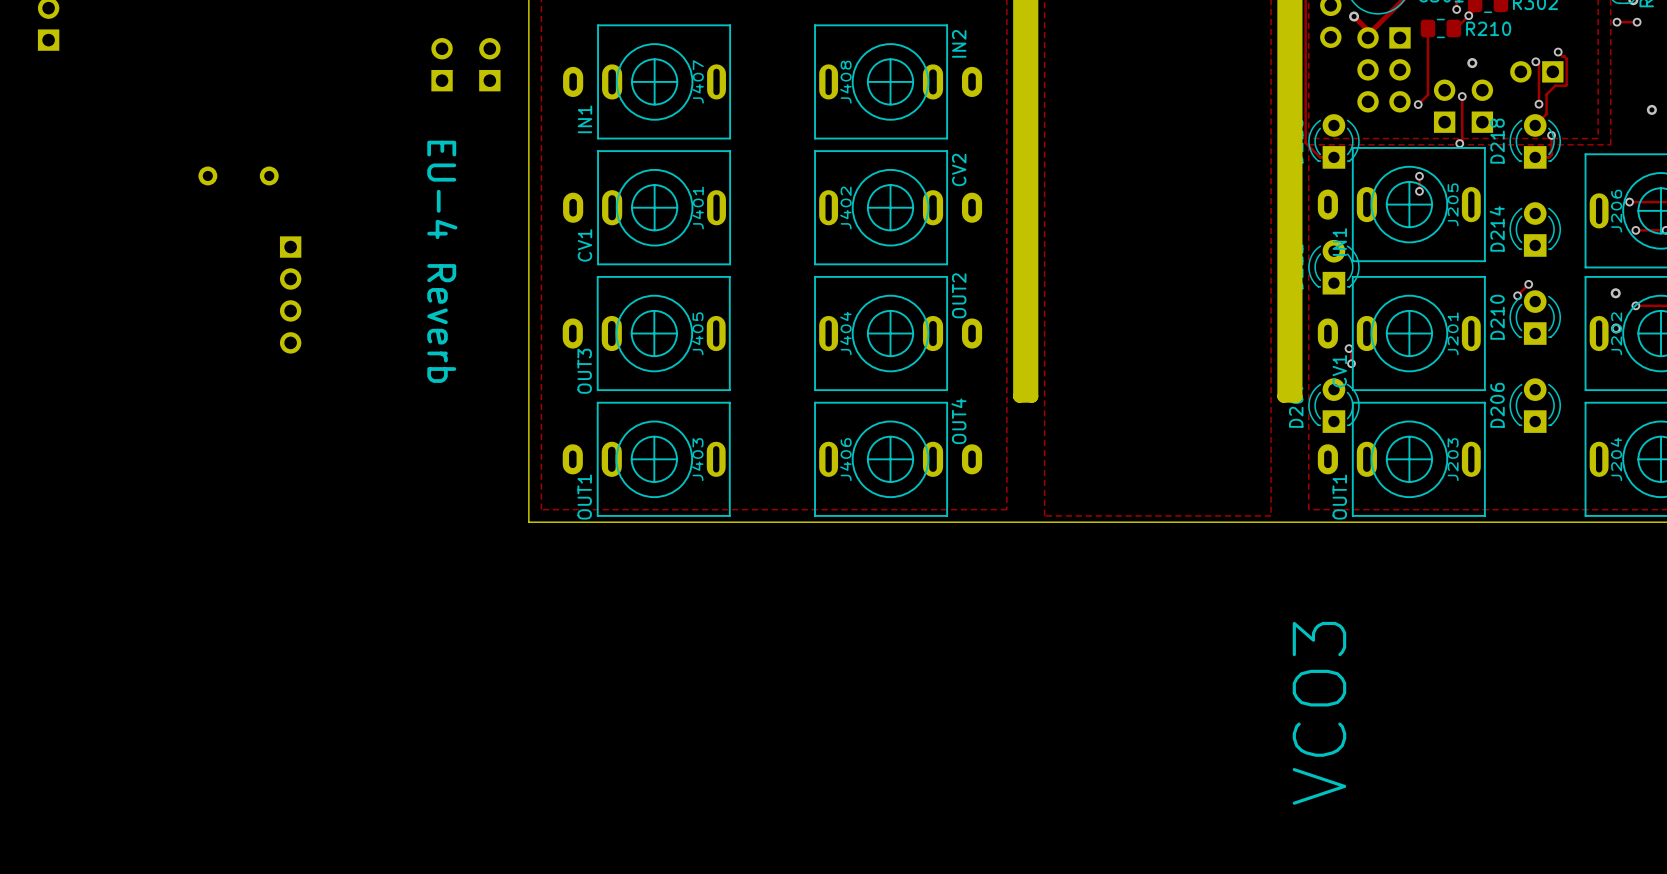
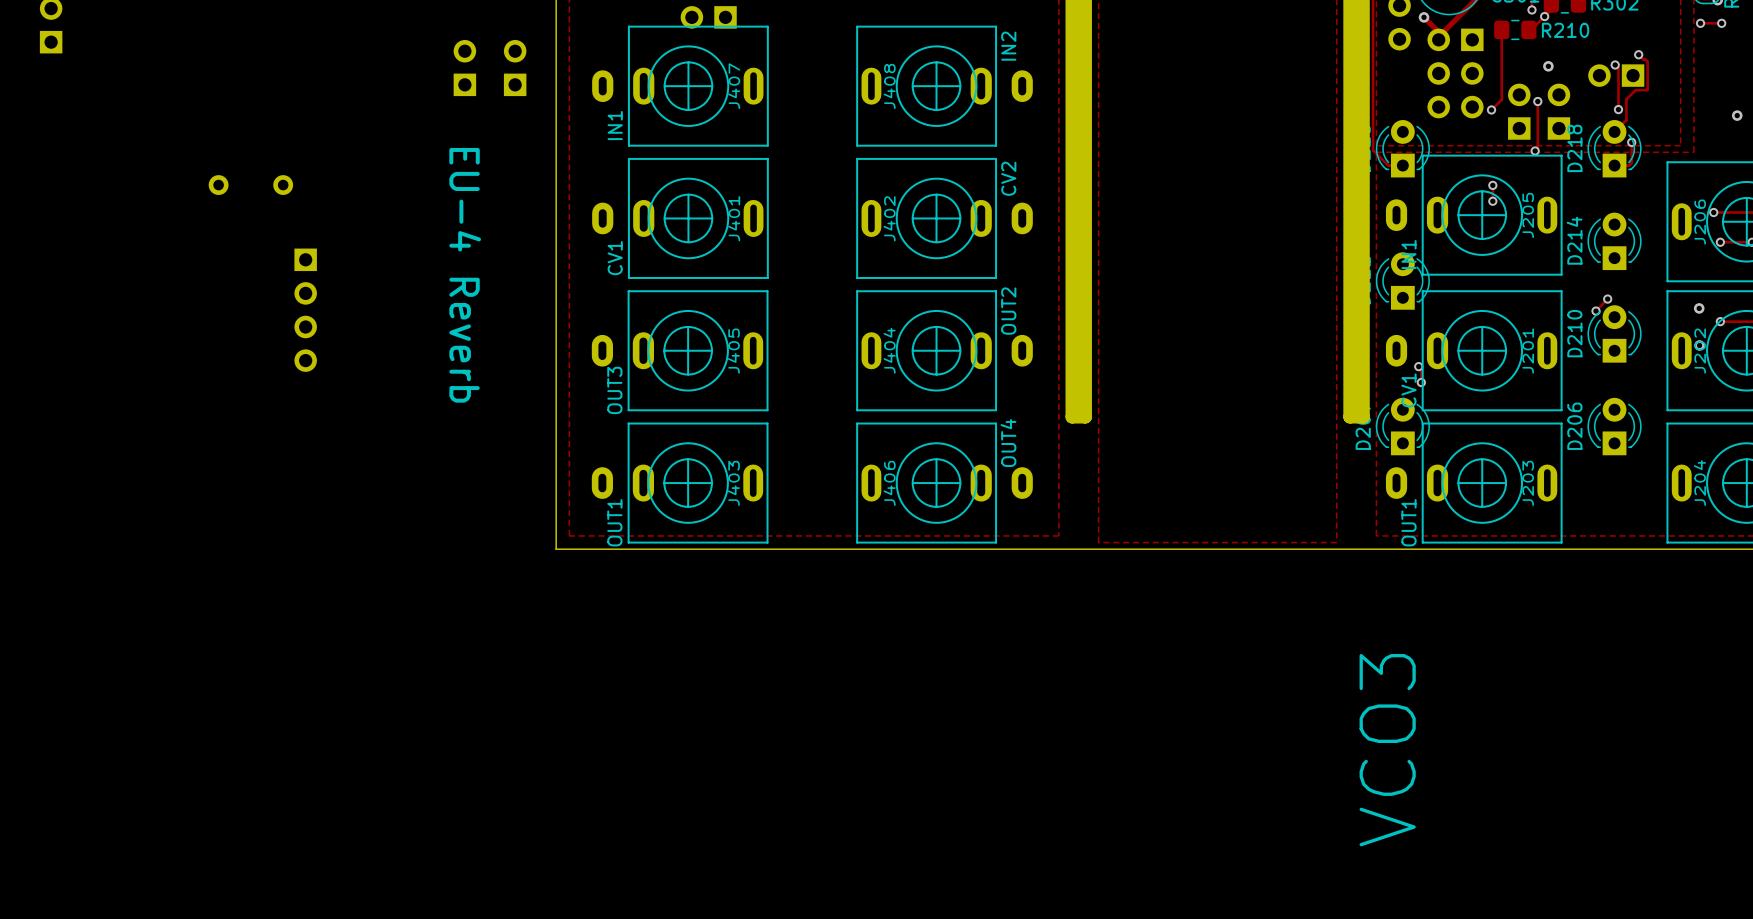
part: none -> (708, 17)

